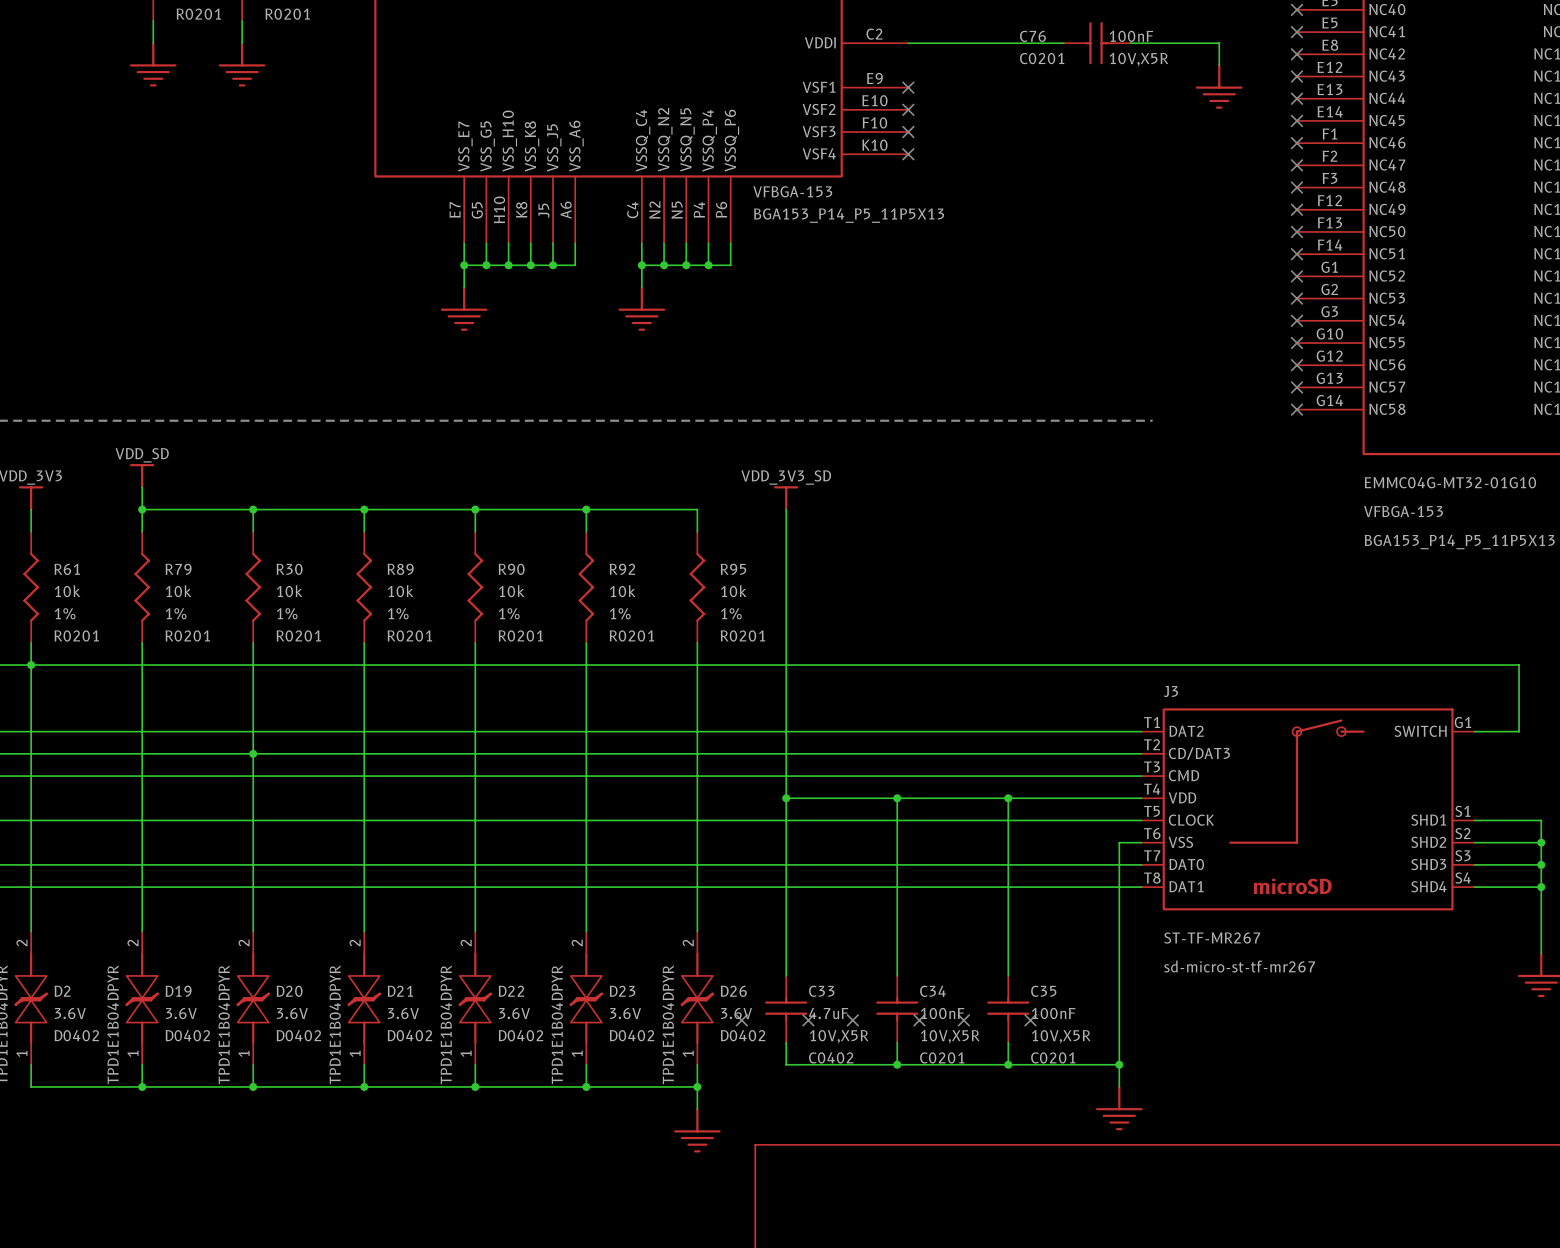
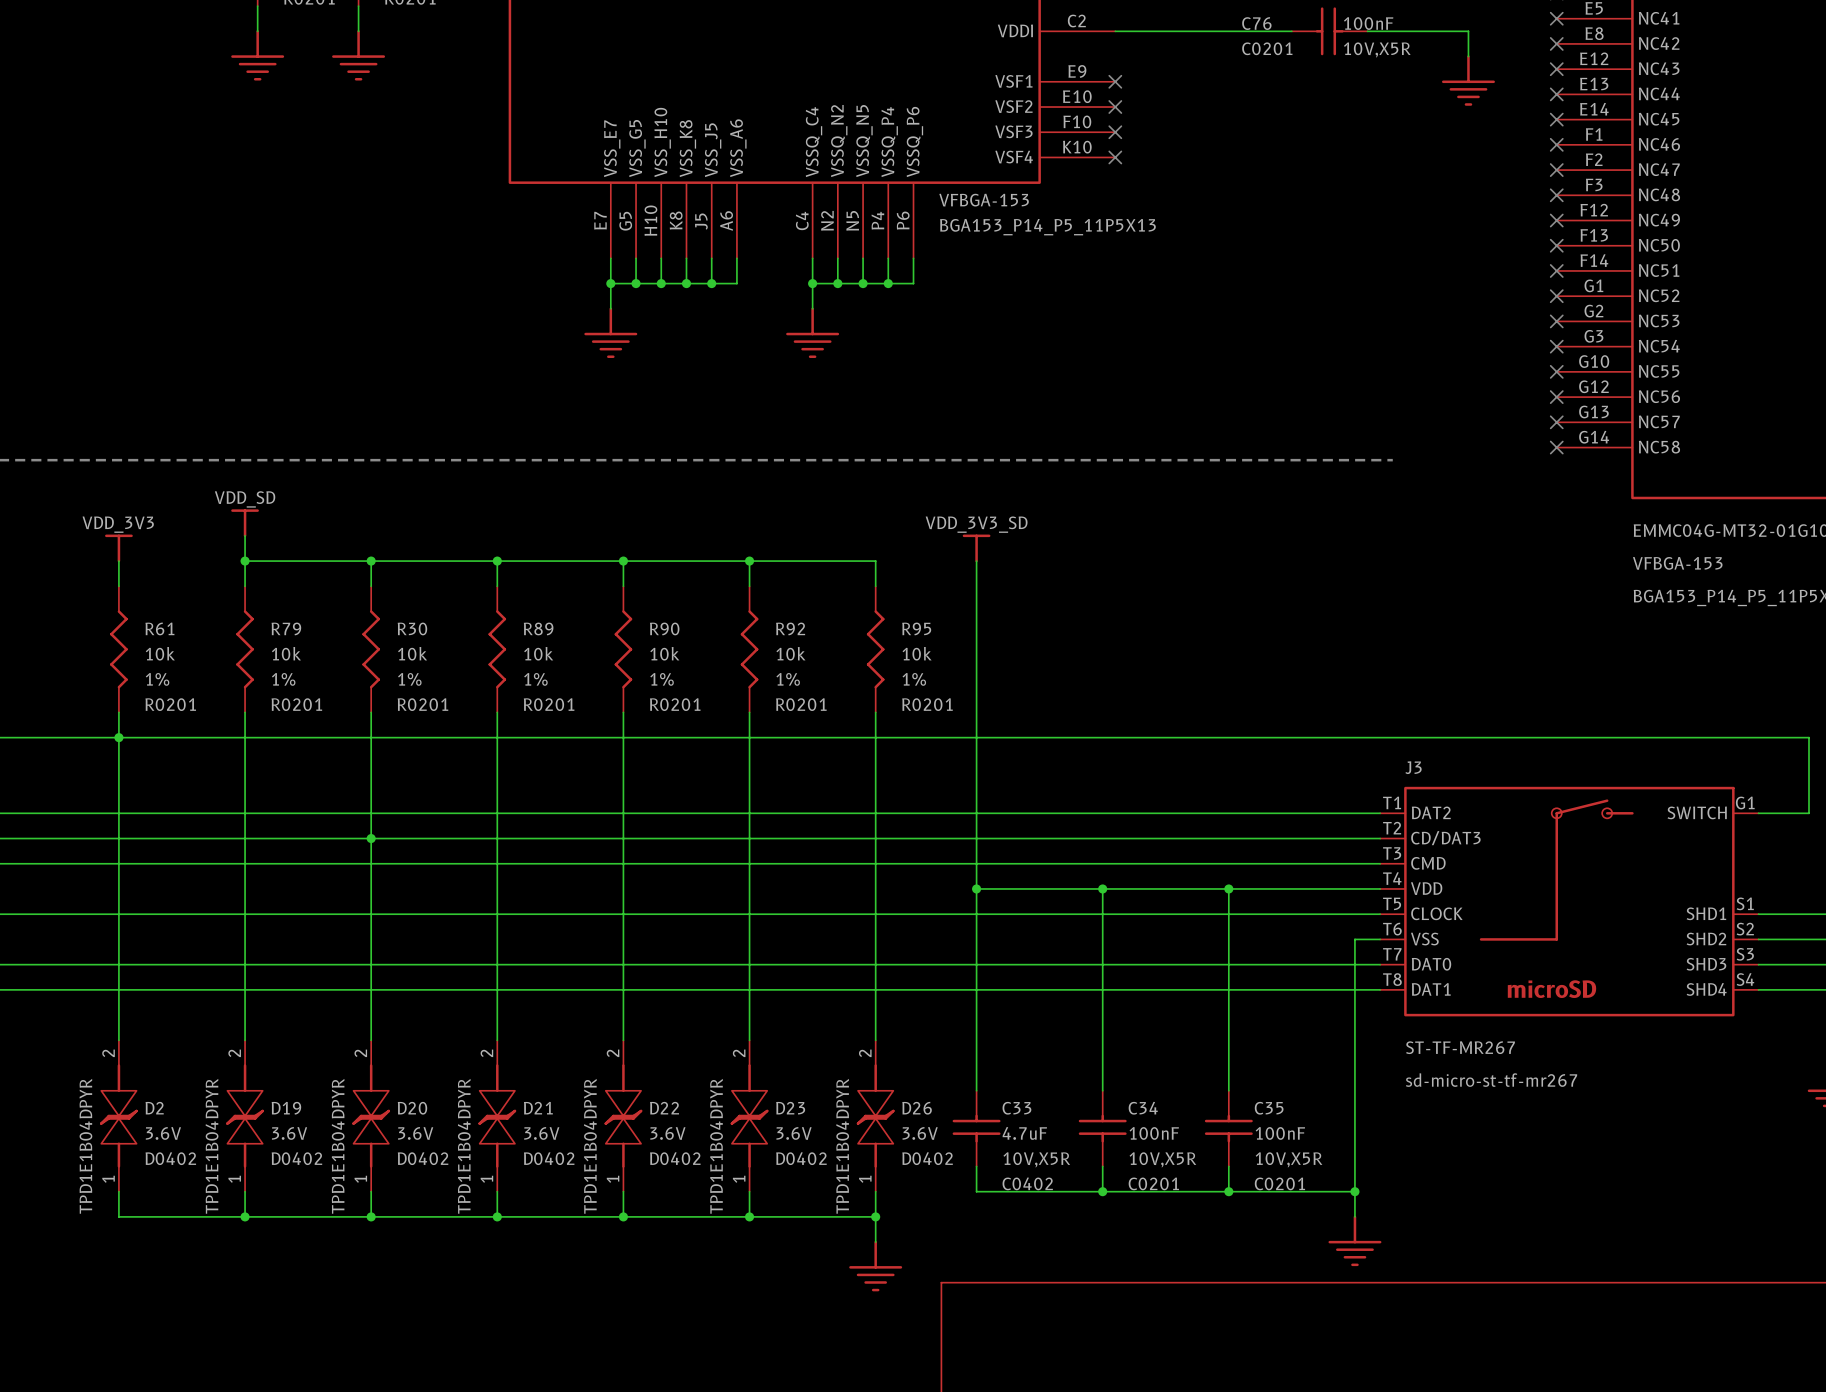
no-connect mark: (741, 1020) -> none
no-connect mark: (808, 1020) -> none
no-connect mark: (852, 1020) -> none
no-connect mark: (919, 1020) -> none
no-connect mark: (963, 1020) -> none
no-connect mark: (1030, 1020) -> none

